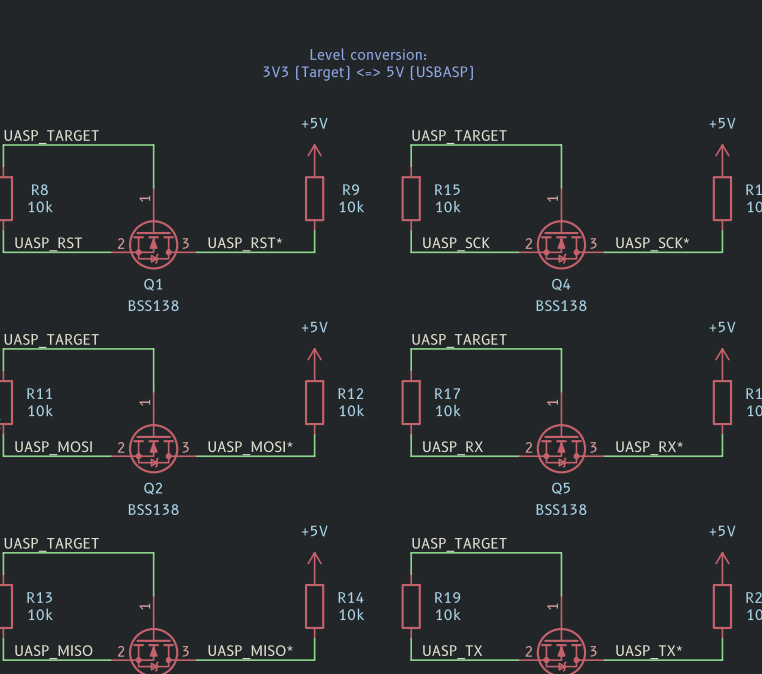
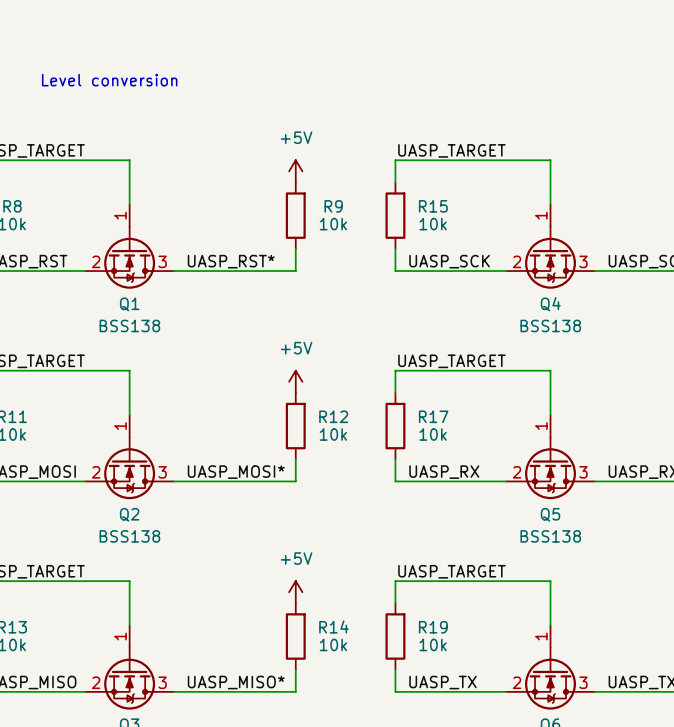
text: Level conversion: (368, 54) -> none
text: none -> Level conversion (109, 80)
text: 3V3 (Target) <=> 5V (USBASP) (368, 73) -> none

